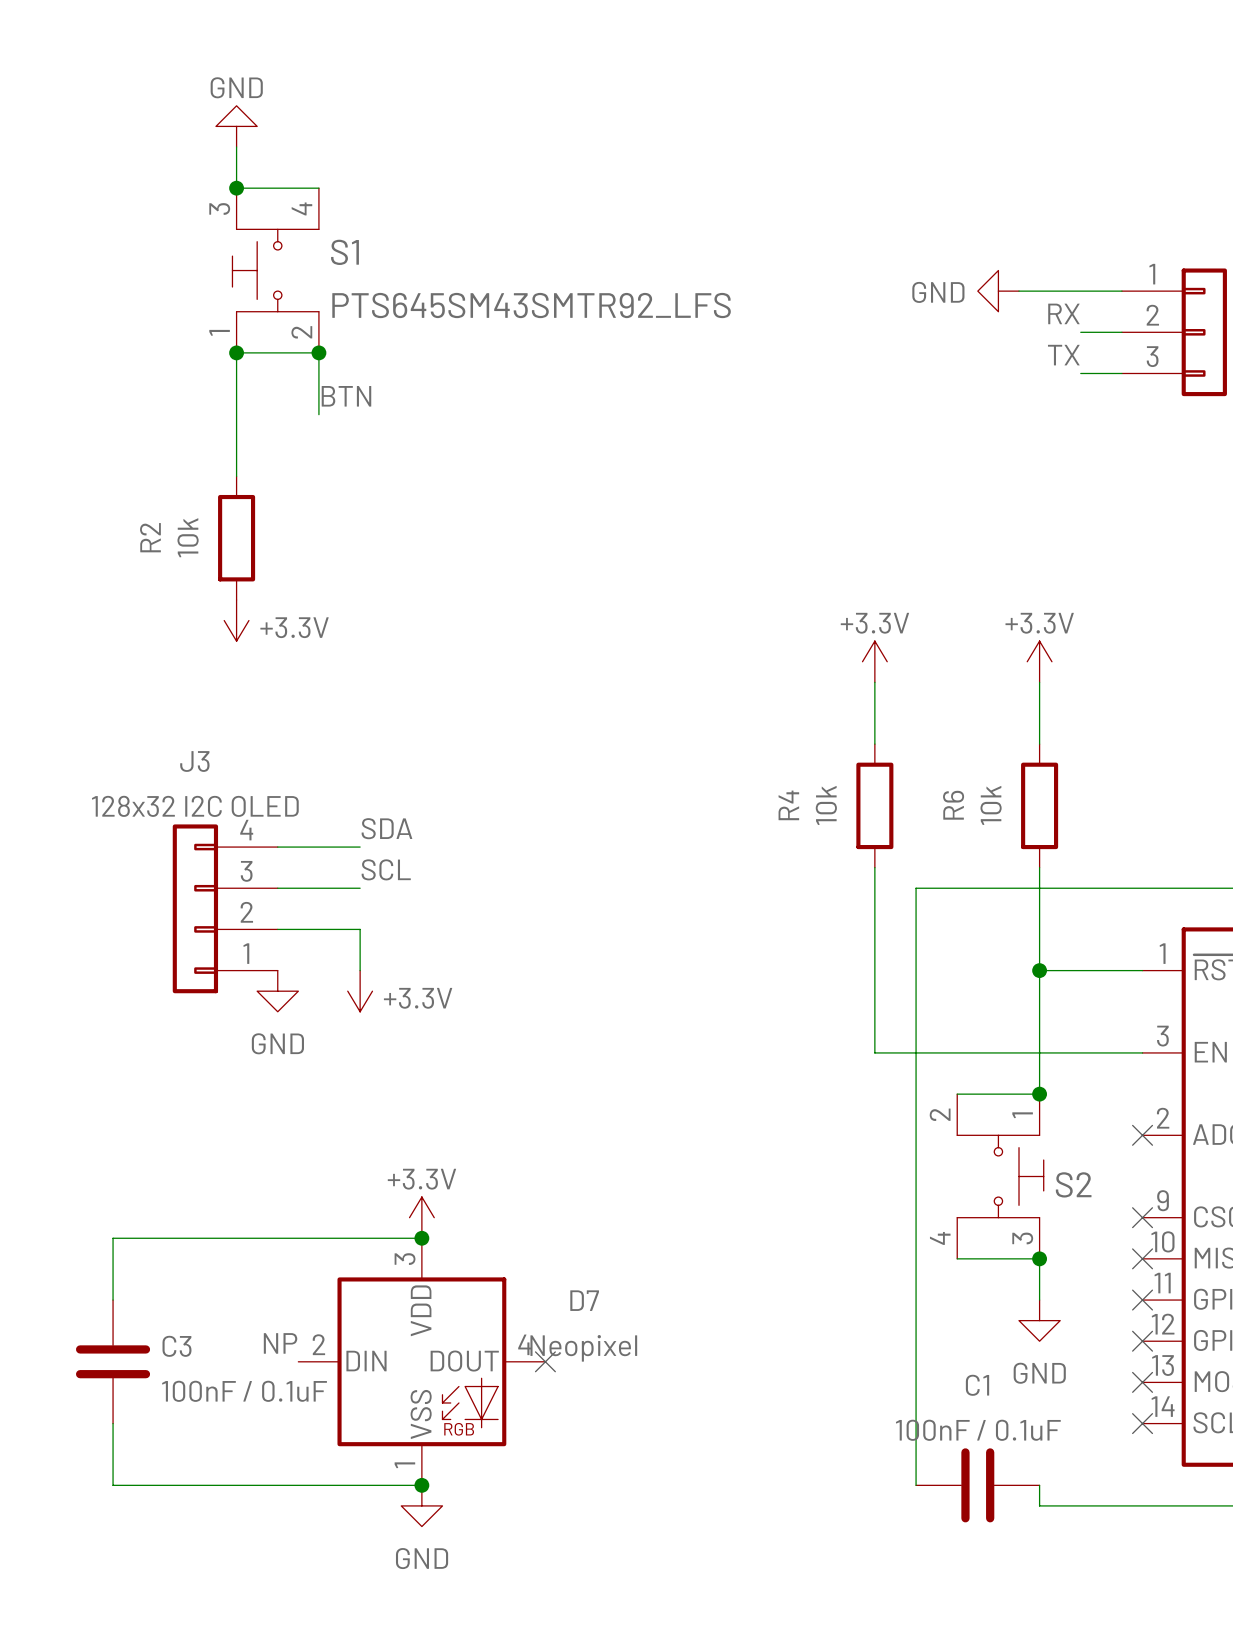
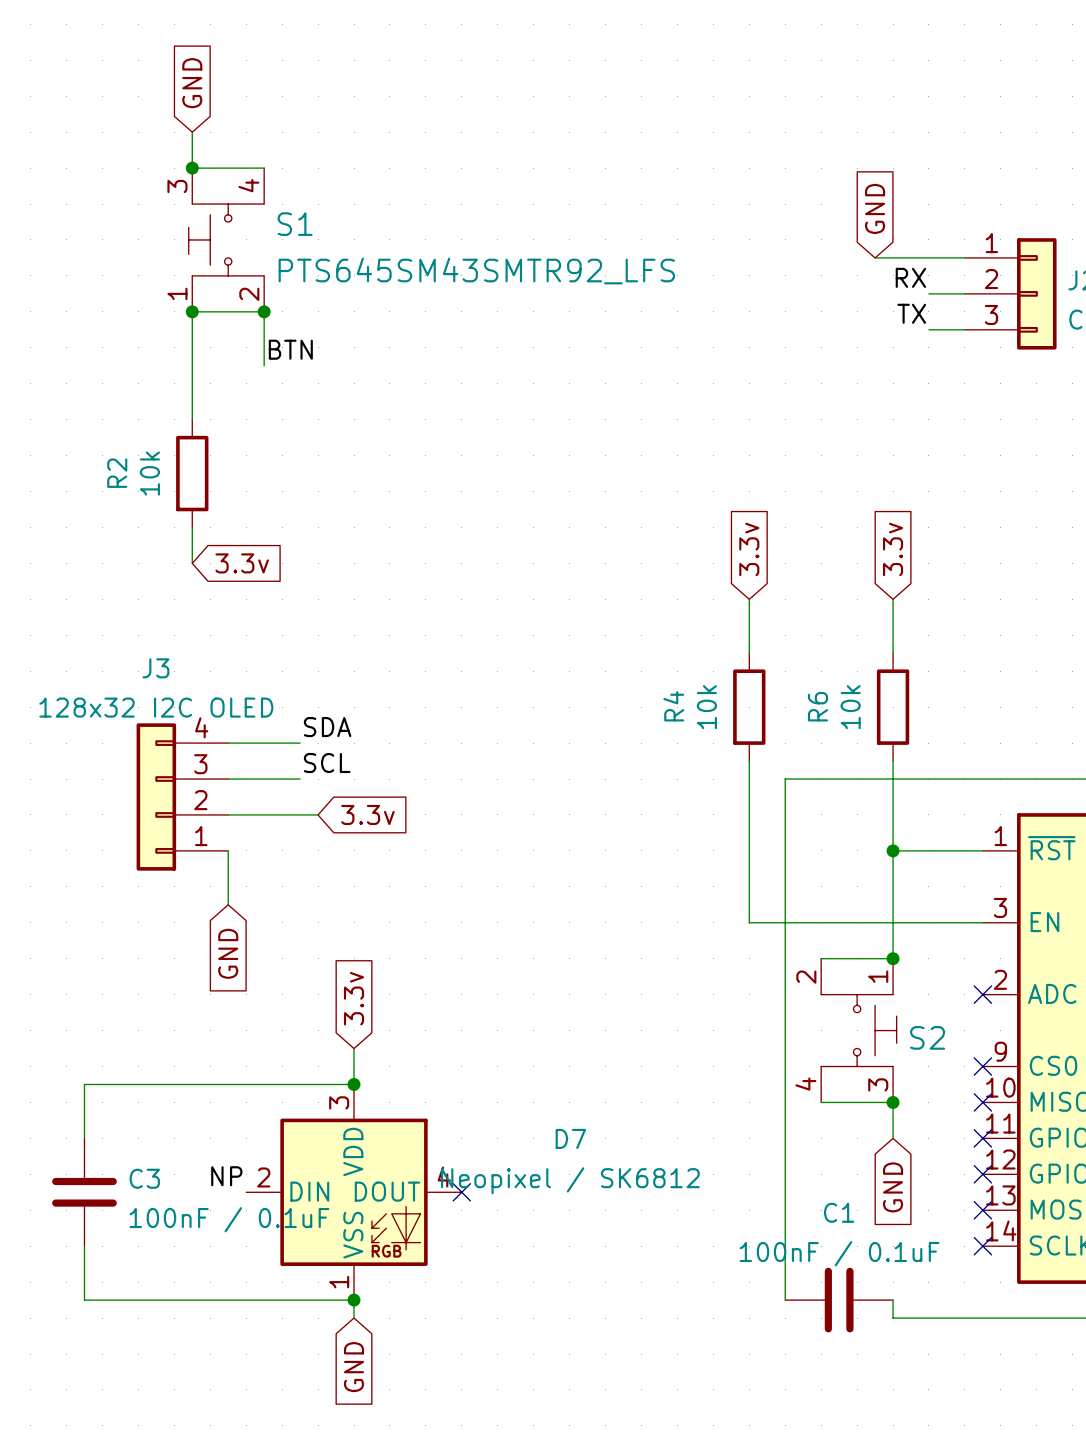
global label: none -> GND (192, 83)
power symbol: GND (236, 126) -> none
global label: none -> GND (875, 208)
power symbol: GND (998, 291) -> none
power symbol: +3.3V (236, 620) -> none
global label: none -> 3.3v (749, 549)
global label: none -> 3.3v (893, 549)
global label: none -> 3.3v (242, 563)
power symbol: +3.3V (874, 661) -> none
power symbol: +3.3V (1039, 661) -> none
wire: (360, 929) (360, 970) -> (300, 814) (318, 814)
global label: none -> 3.3v (367, 814)
wire: none -> (228, 850) (228, 904)
power symbol: GND (277, 991) -> none
power symbol: +3.3V (360, 991) -> none
global label: none -> GND (228, 953)
global label: none -> 3.3v (354, 998)
power symbol: +3.3V (421, 1217) -> none
D7 name position: D7 (584, 1300) -> D7 (570, 1138)
power symbol: GND (1039, 1320) -> none
D7 value: Neopixel (583, 1348) -> Neopixel / SK6812 (570, 1180)
global label: none -> GND (893, 1187)
power symbol: GND (421, 1505) -> none
global label: none -> GND (354, 1367)

